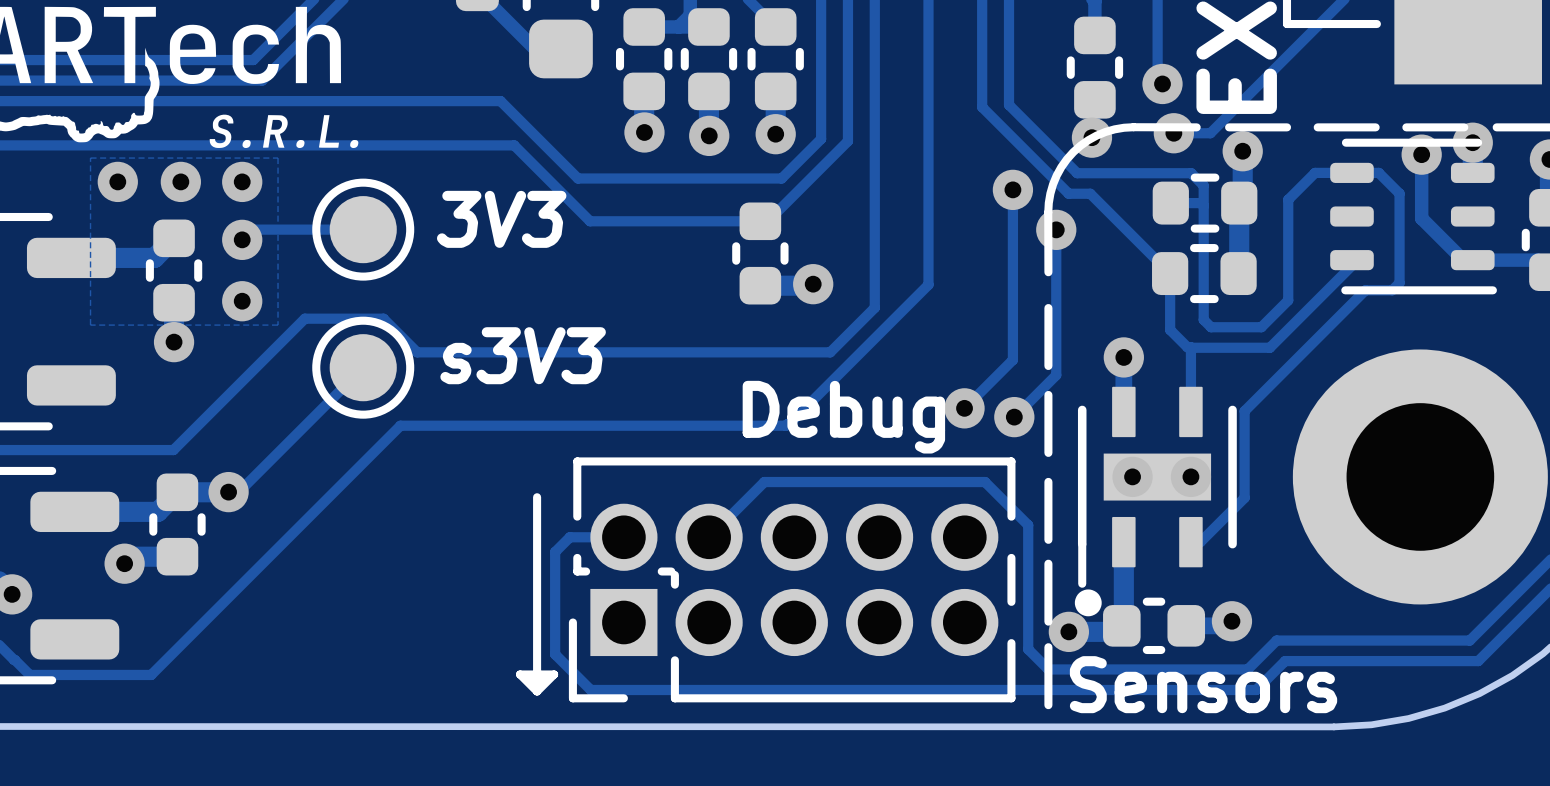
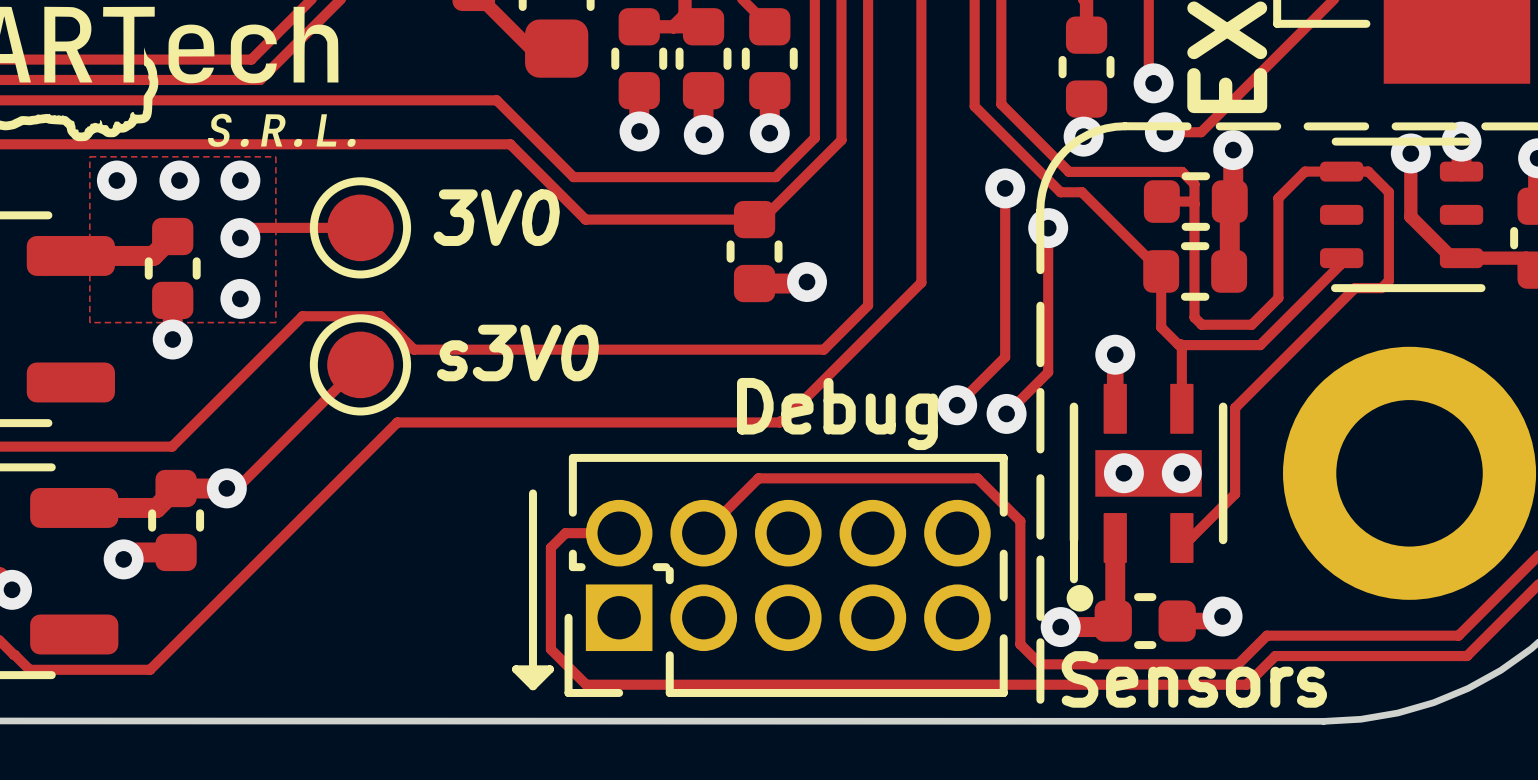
text: 3V3 (501, 219) -> 3V0 (496, 217)
text: s3V3 (523, 355) -> s3V0 (518, 352)

